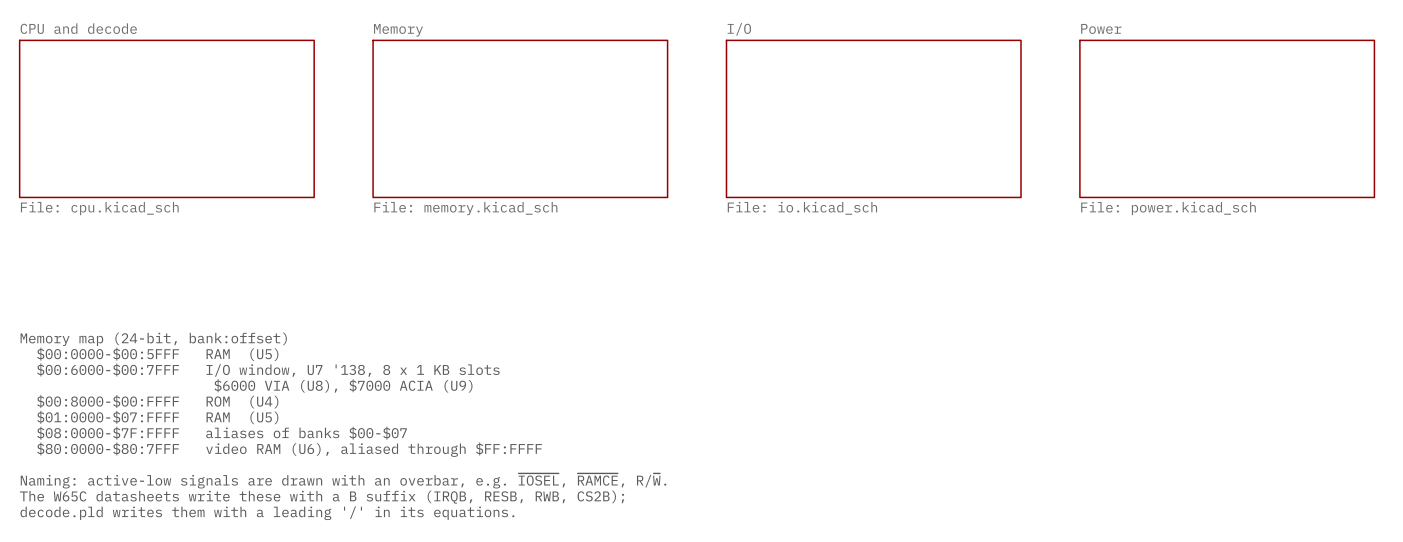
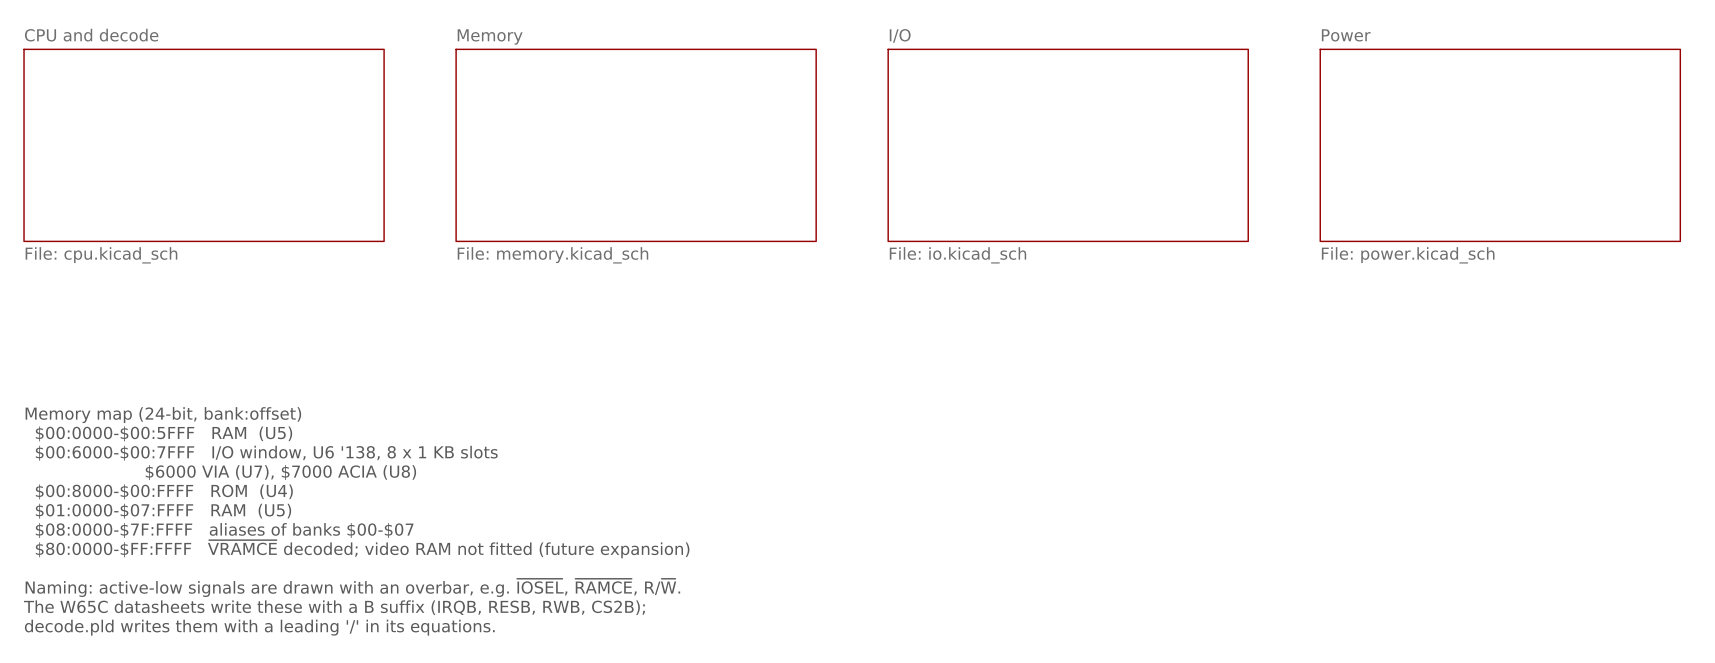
text: $00:6000-$00:7FFF I/O window, U7 '138, 8 x 1 KB slots (268, 370) -> $00:6000-$00:7FFF I/O window, U6 '138, 8 x 1 KB slots (266, 453)
text: $6000 VIA (U8), $7000 ACIA (U9) (343, 385) -> $6000 VIA (U7), $7000 ACIA (U8) (280, 472)
text: $80:0000-$80:7FFF video RAM (U6), aliased through $FF:FFFF (289, 449) -> $80:0000-$FF:FFFF ~{VRAMCE} decoded; video RAM not fitted (future expansion) (362, 549)

